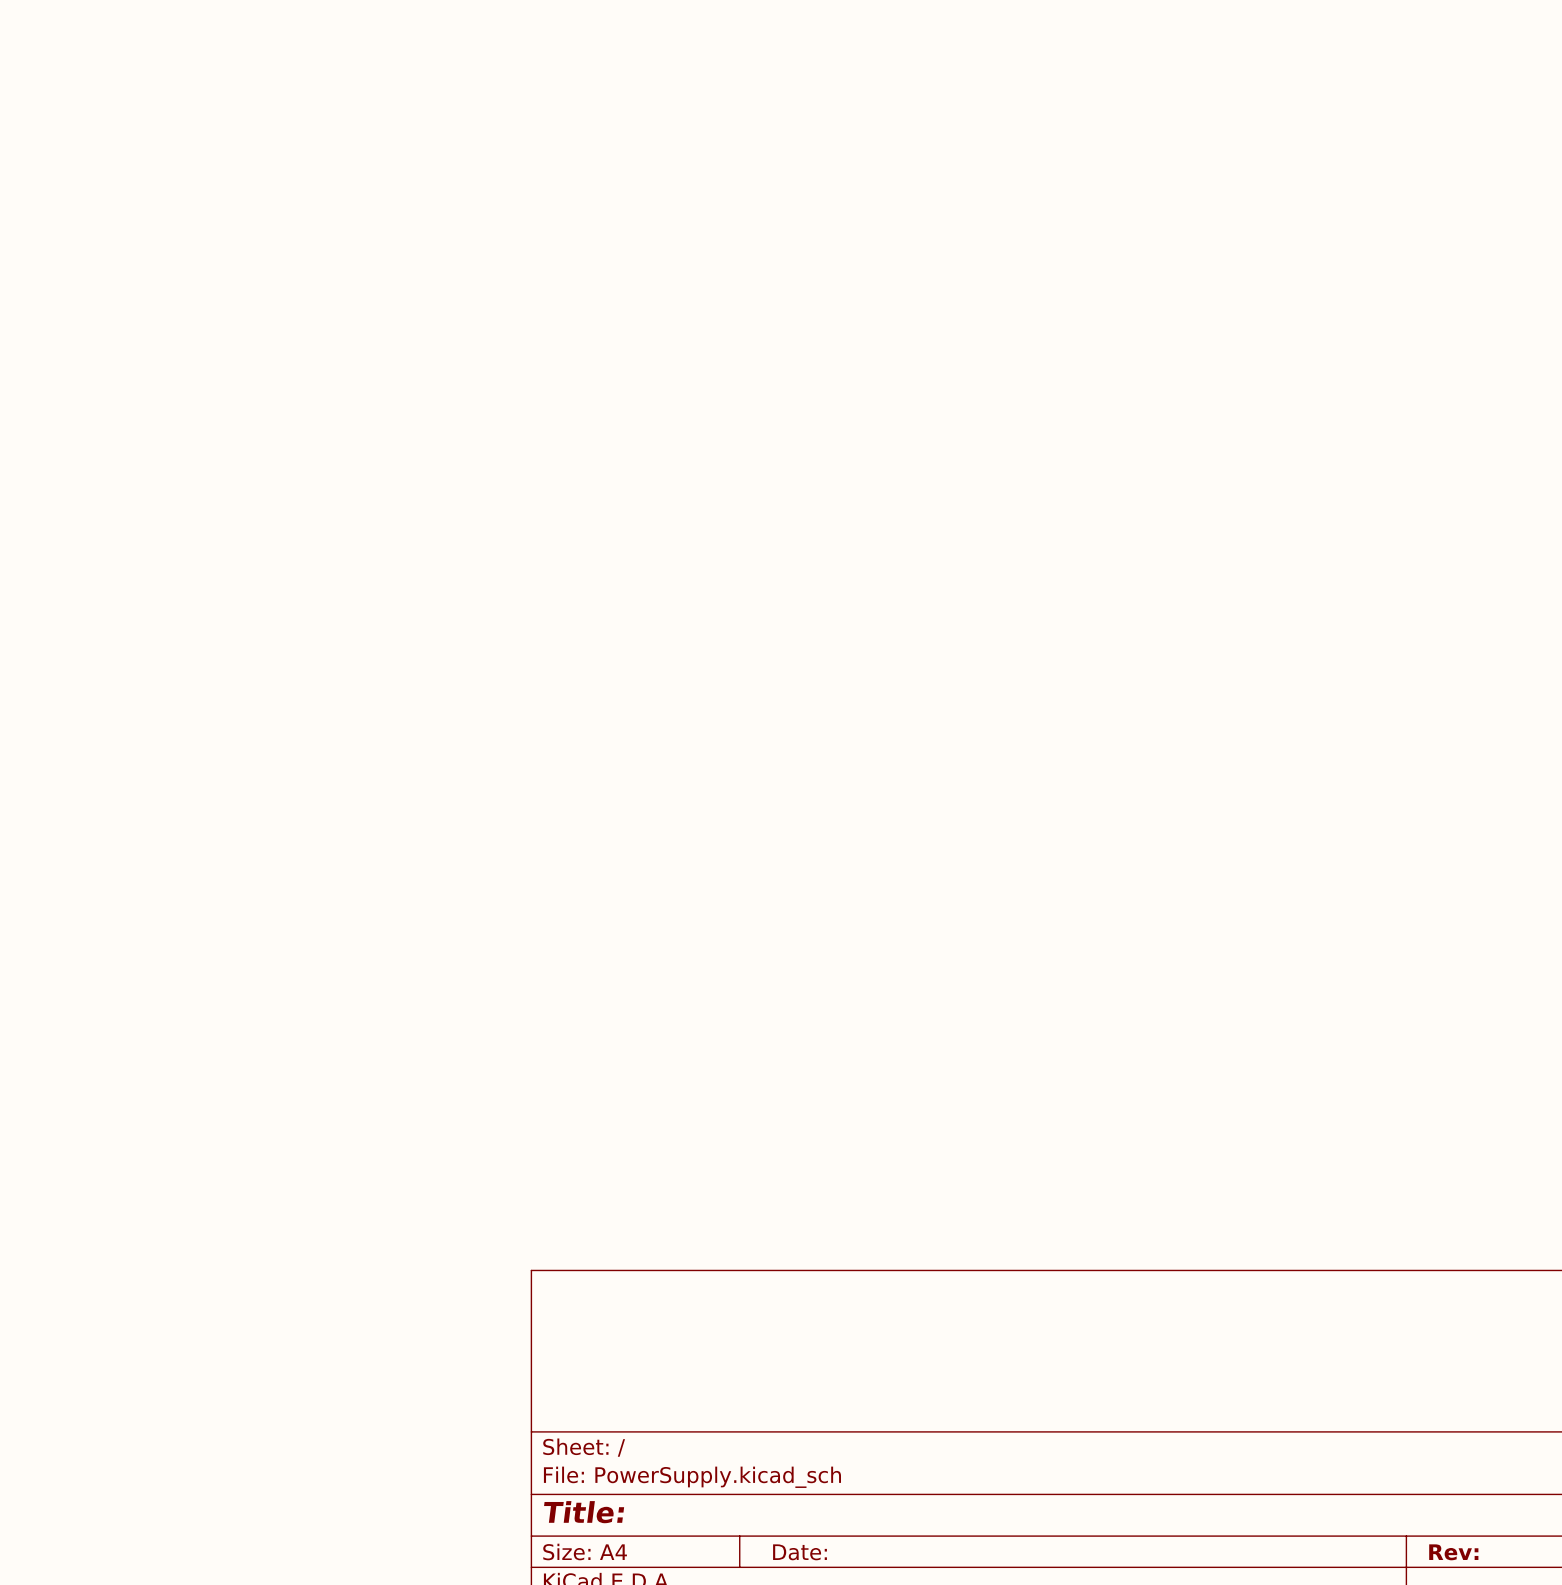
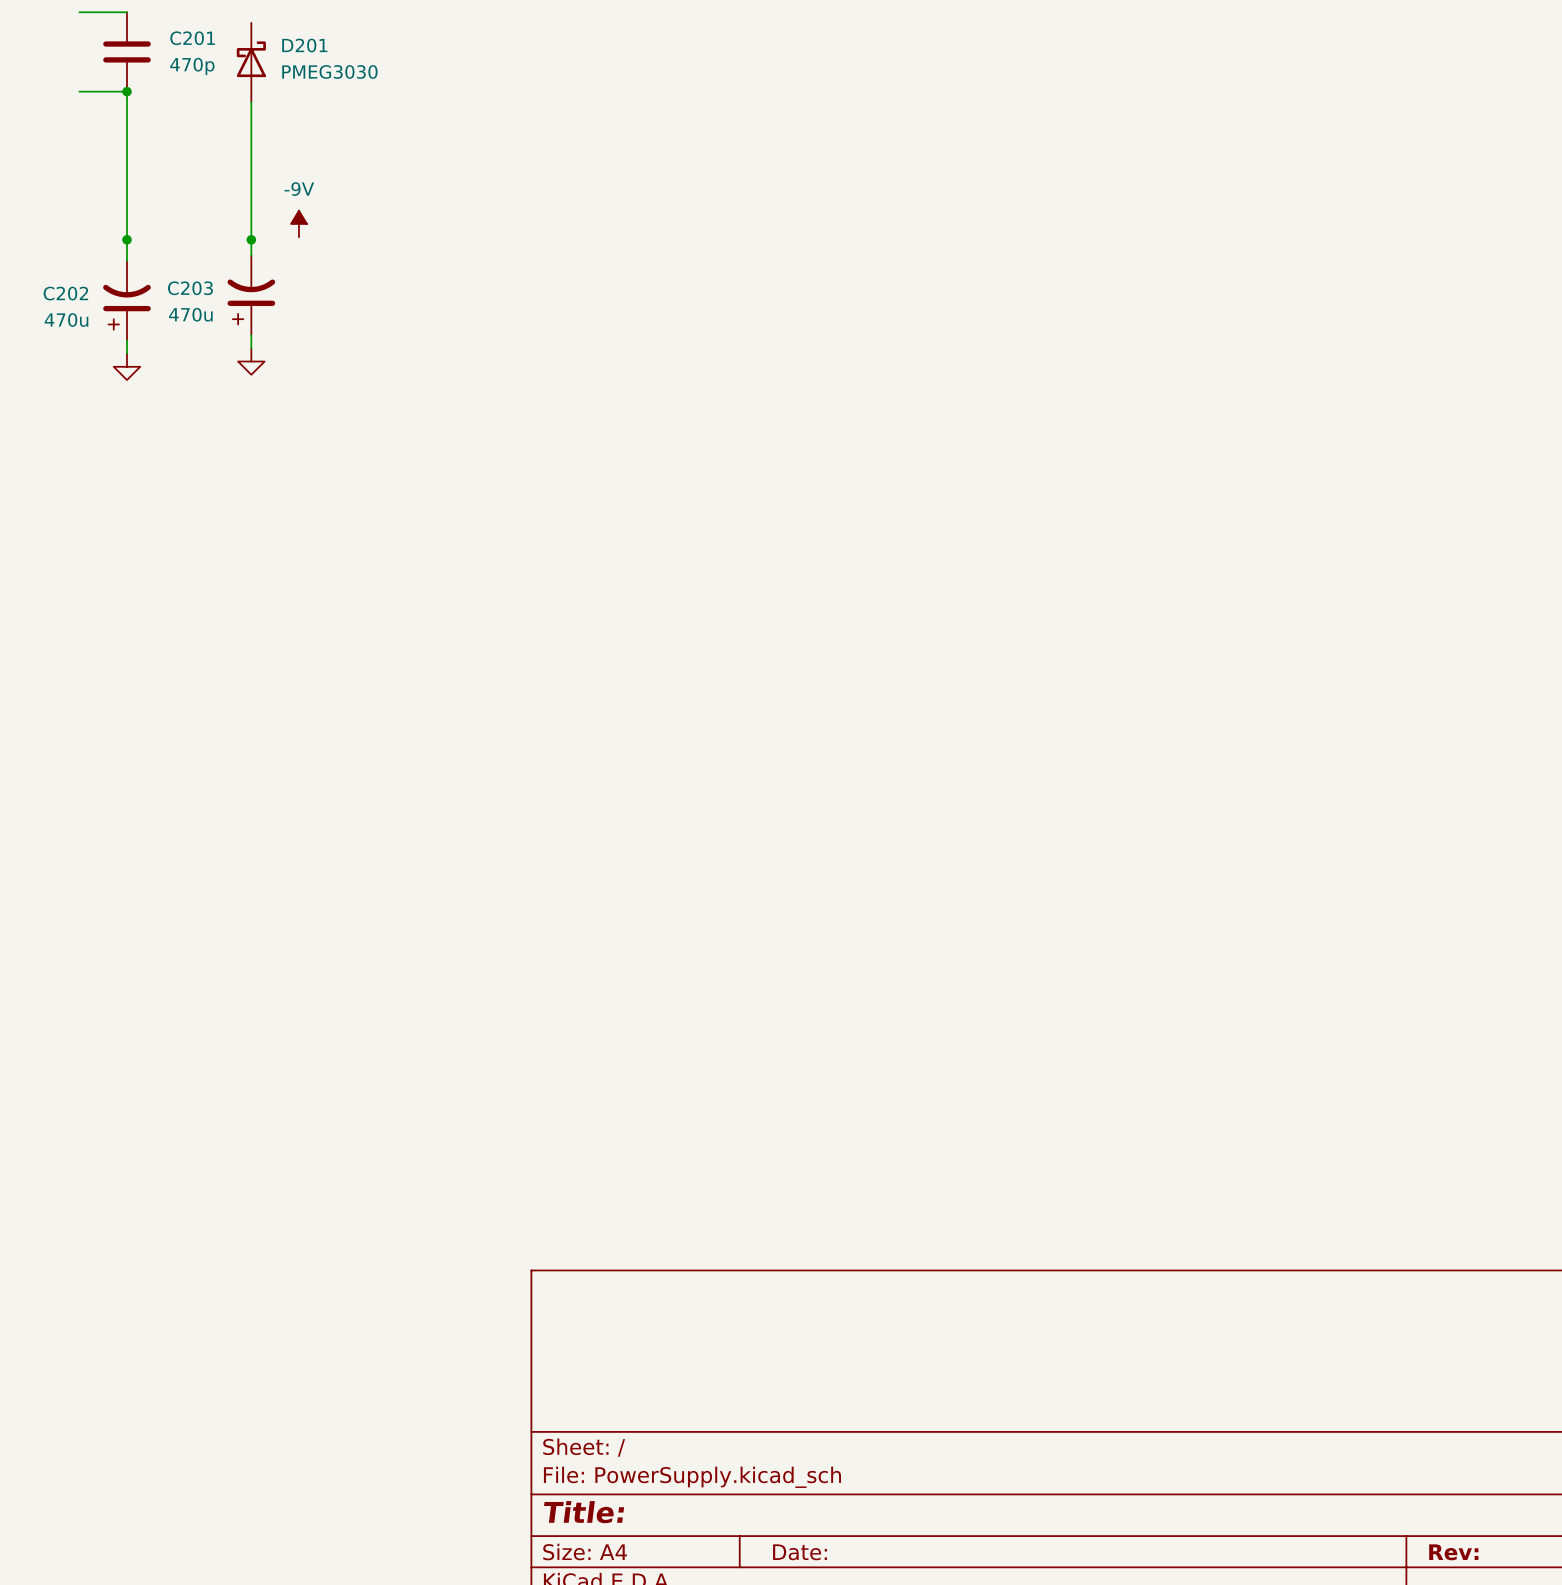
wire: none -> (79, 12) (126, 12)
C201: none -> 470p (126, 51)
D201: none -> PMEG3030 (251, 62)
wire: none -> (79, 91) (126, 91) (126, 260)
junction: none -> (126, 91)
wire: none -> (251, 102) (251, 255)
power symbol: none -> -9V (298, 223)
junction: none -> (126, 239)
junction: none -> (251, 239)
C203: none -> 470u (251, 295)
C202: none -> 470u (126, 300)
wire: none -> (251, 335) (251, 348)
wire: none -> (126, 340) (126, 353)
power symbol: none -> (251, 361)
power symbol: none -> (126, 366)

